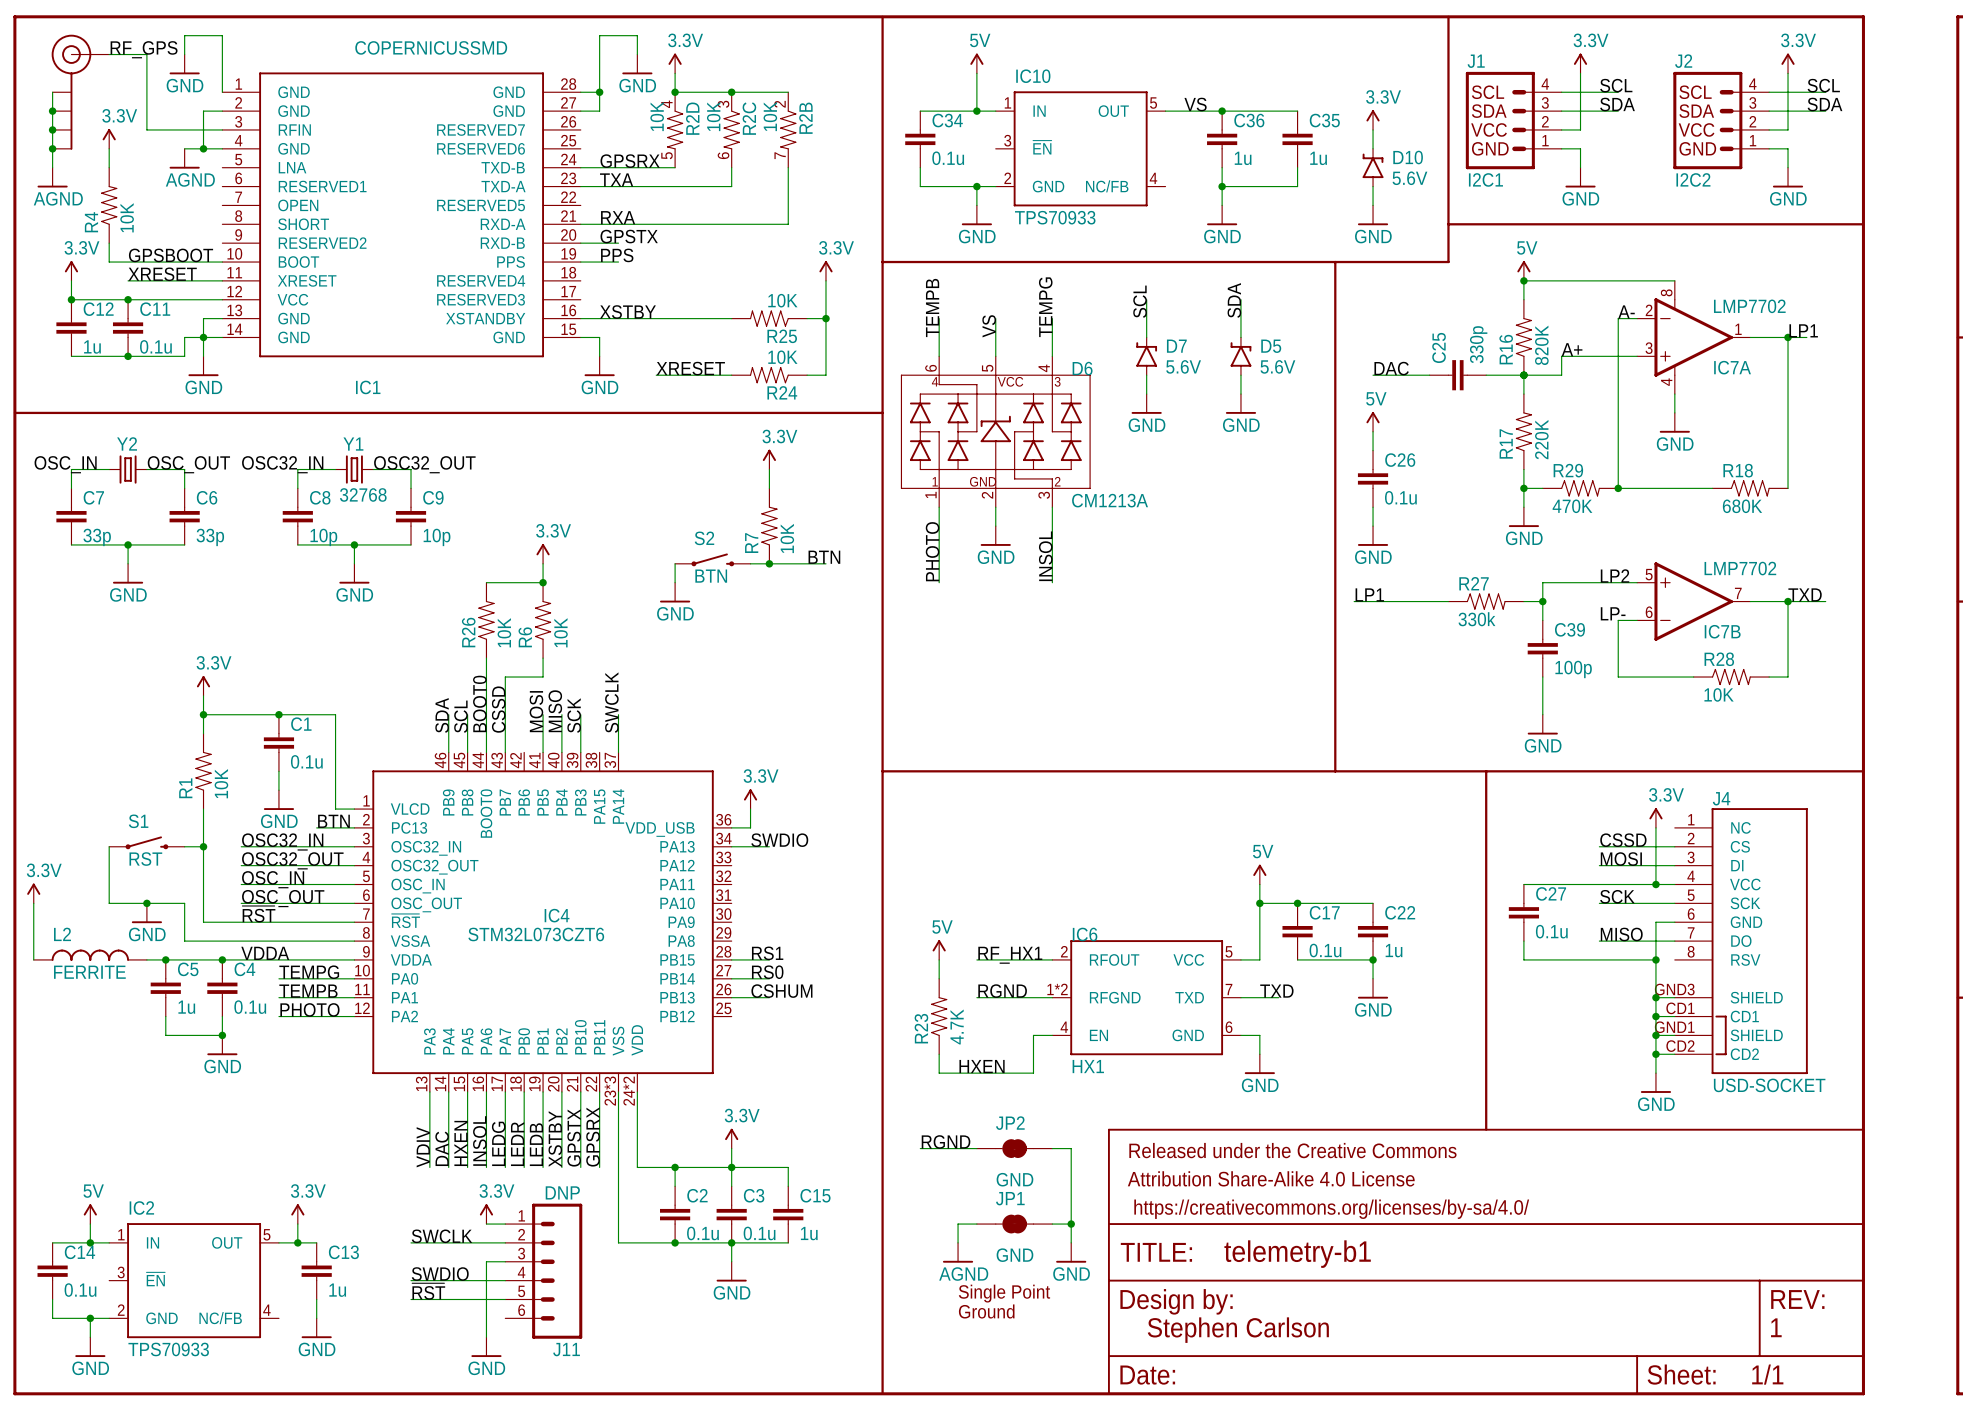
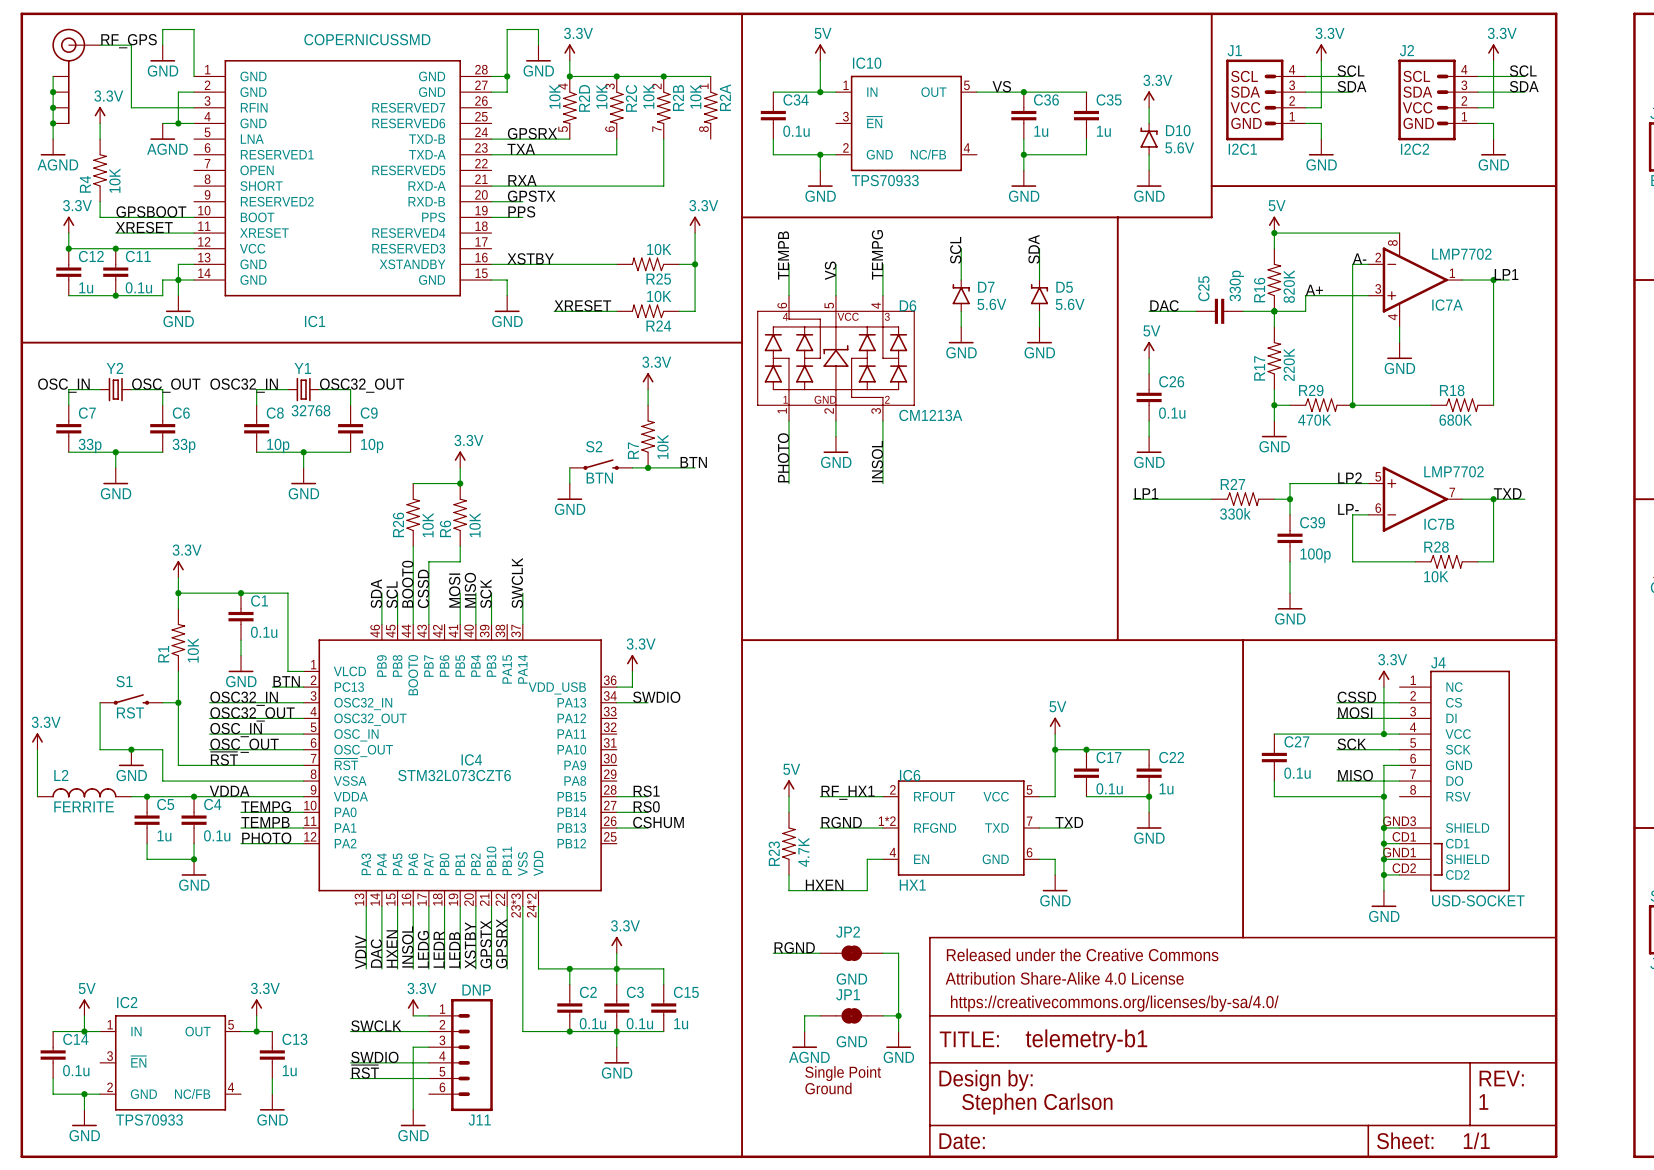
wire: none -> (663, 76) (710, 76)
junction: none -> (663, 76)
R2A: none -> 10K (710, 107)

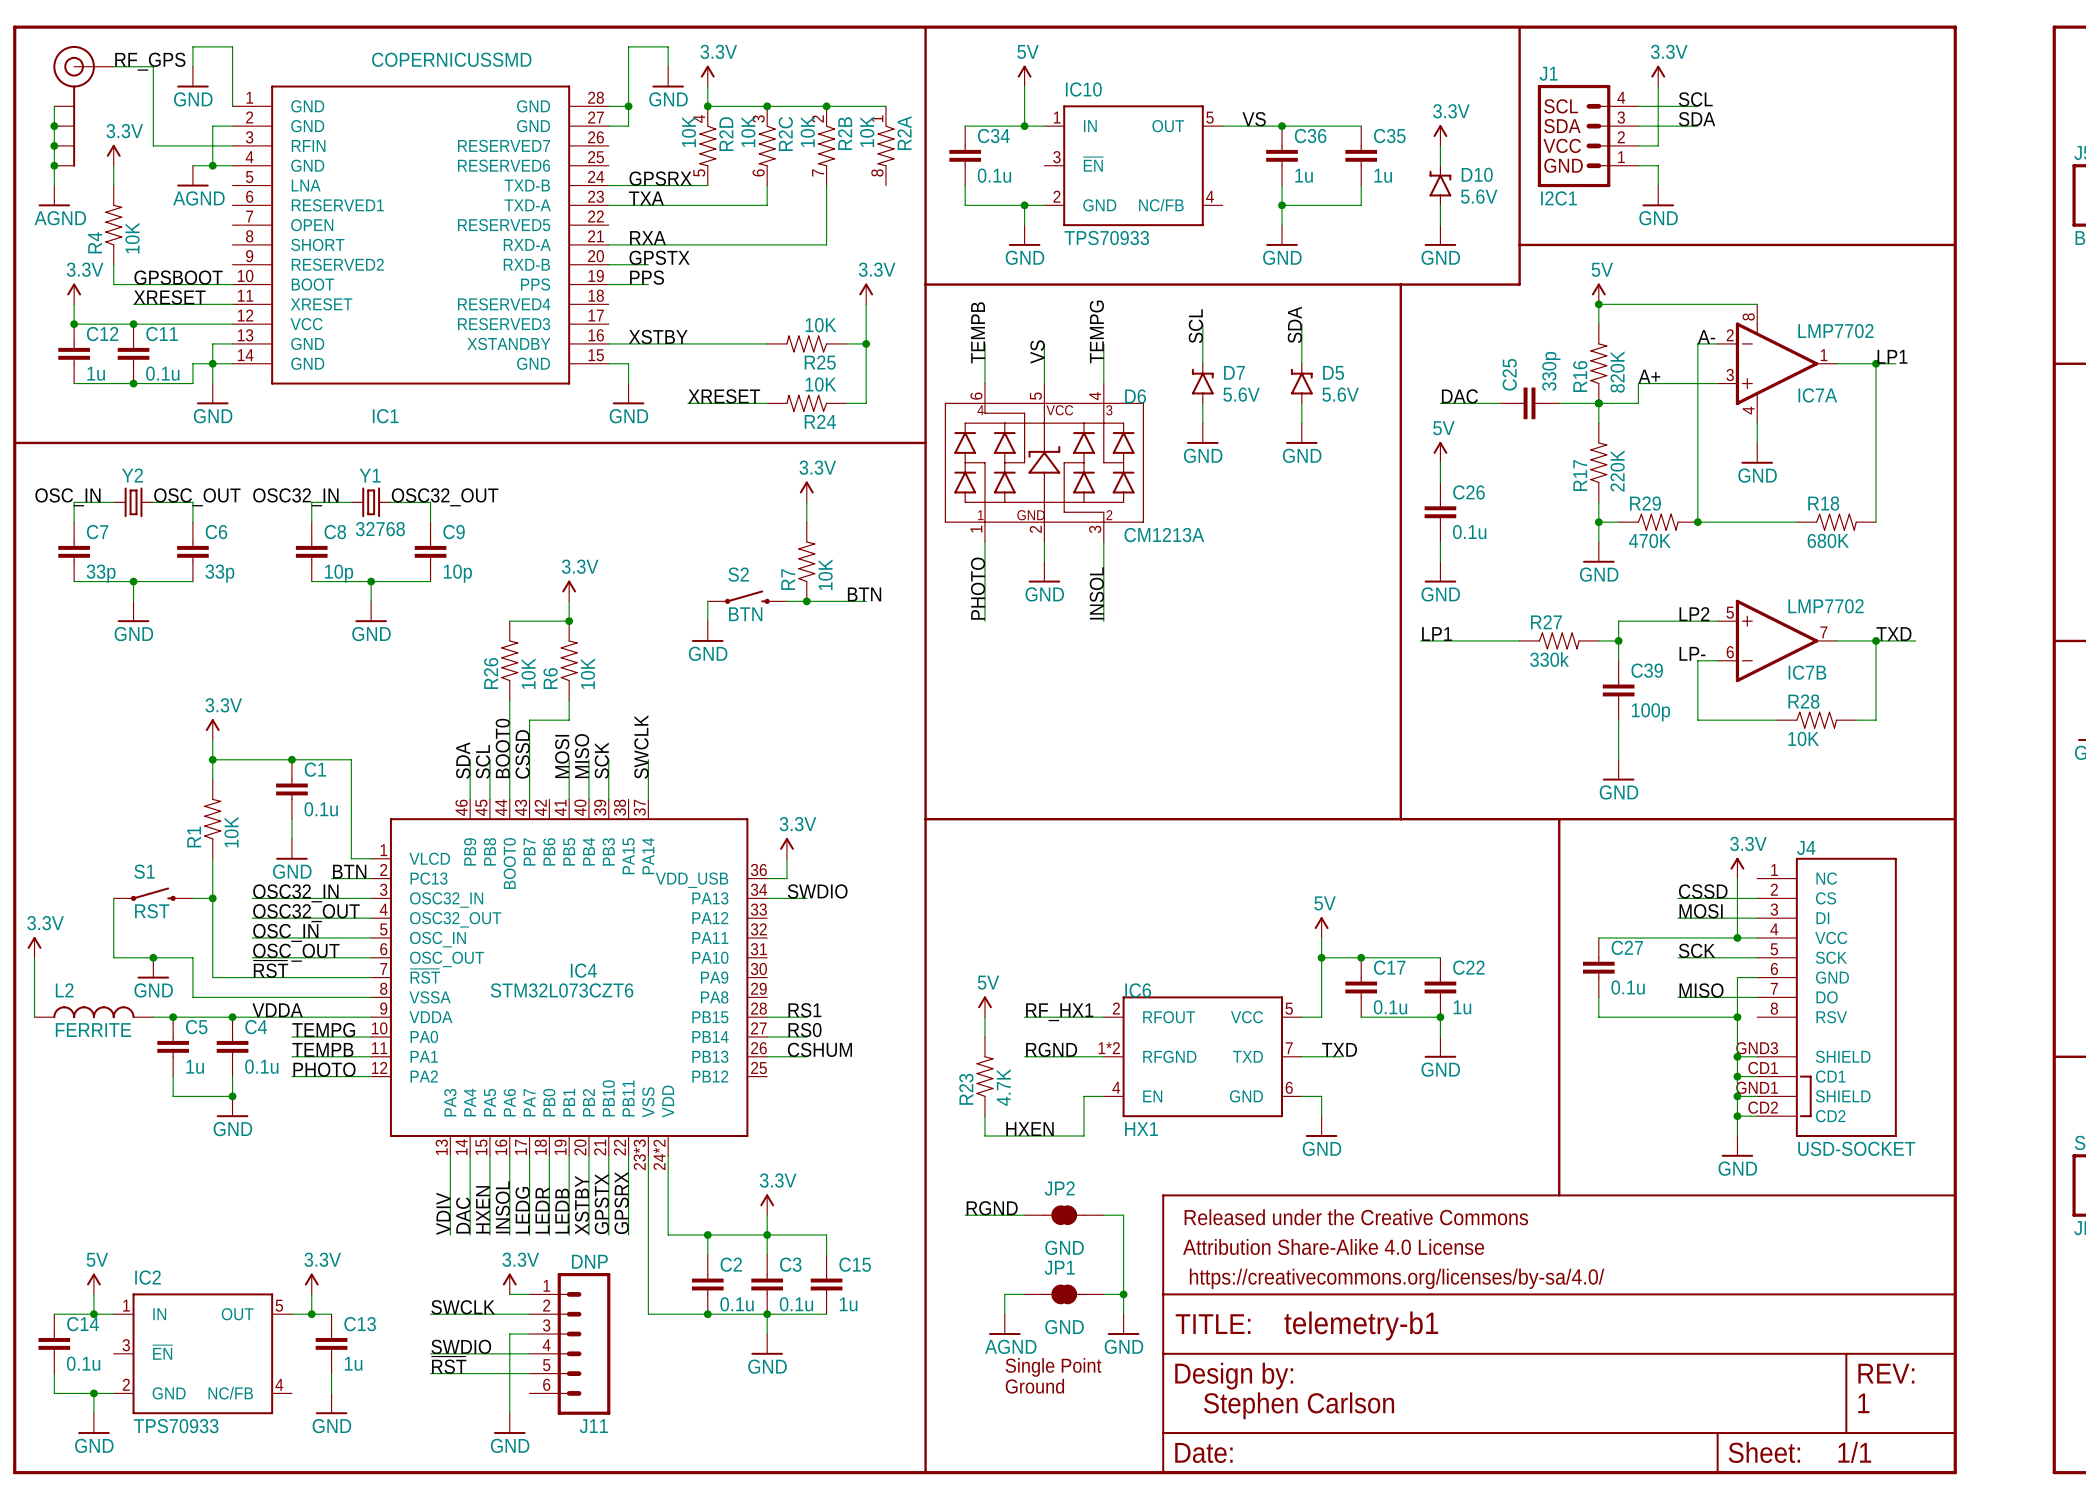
power symbol: 3.3V (1493, 52) -> none
wire: (1493, 60) (1493, 107) (1477, 107) -> none
label: SCL (1523, 70) -> none
wire: (1477, 76) (1524, 76) -> none
label: SDA (1524, 86) -> none
wire: (1477, 92) (1524, 92) -> none
J2: I2C2 (1438, 99) -> none
wire: (1477, 123) (1493, 123) (1493, 139) -> none
power symbol: GND (1493, 147) -> none

